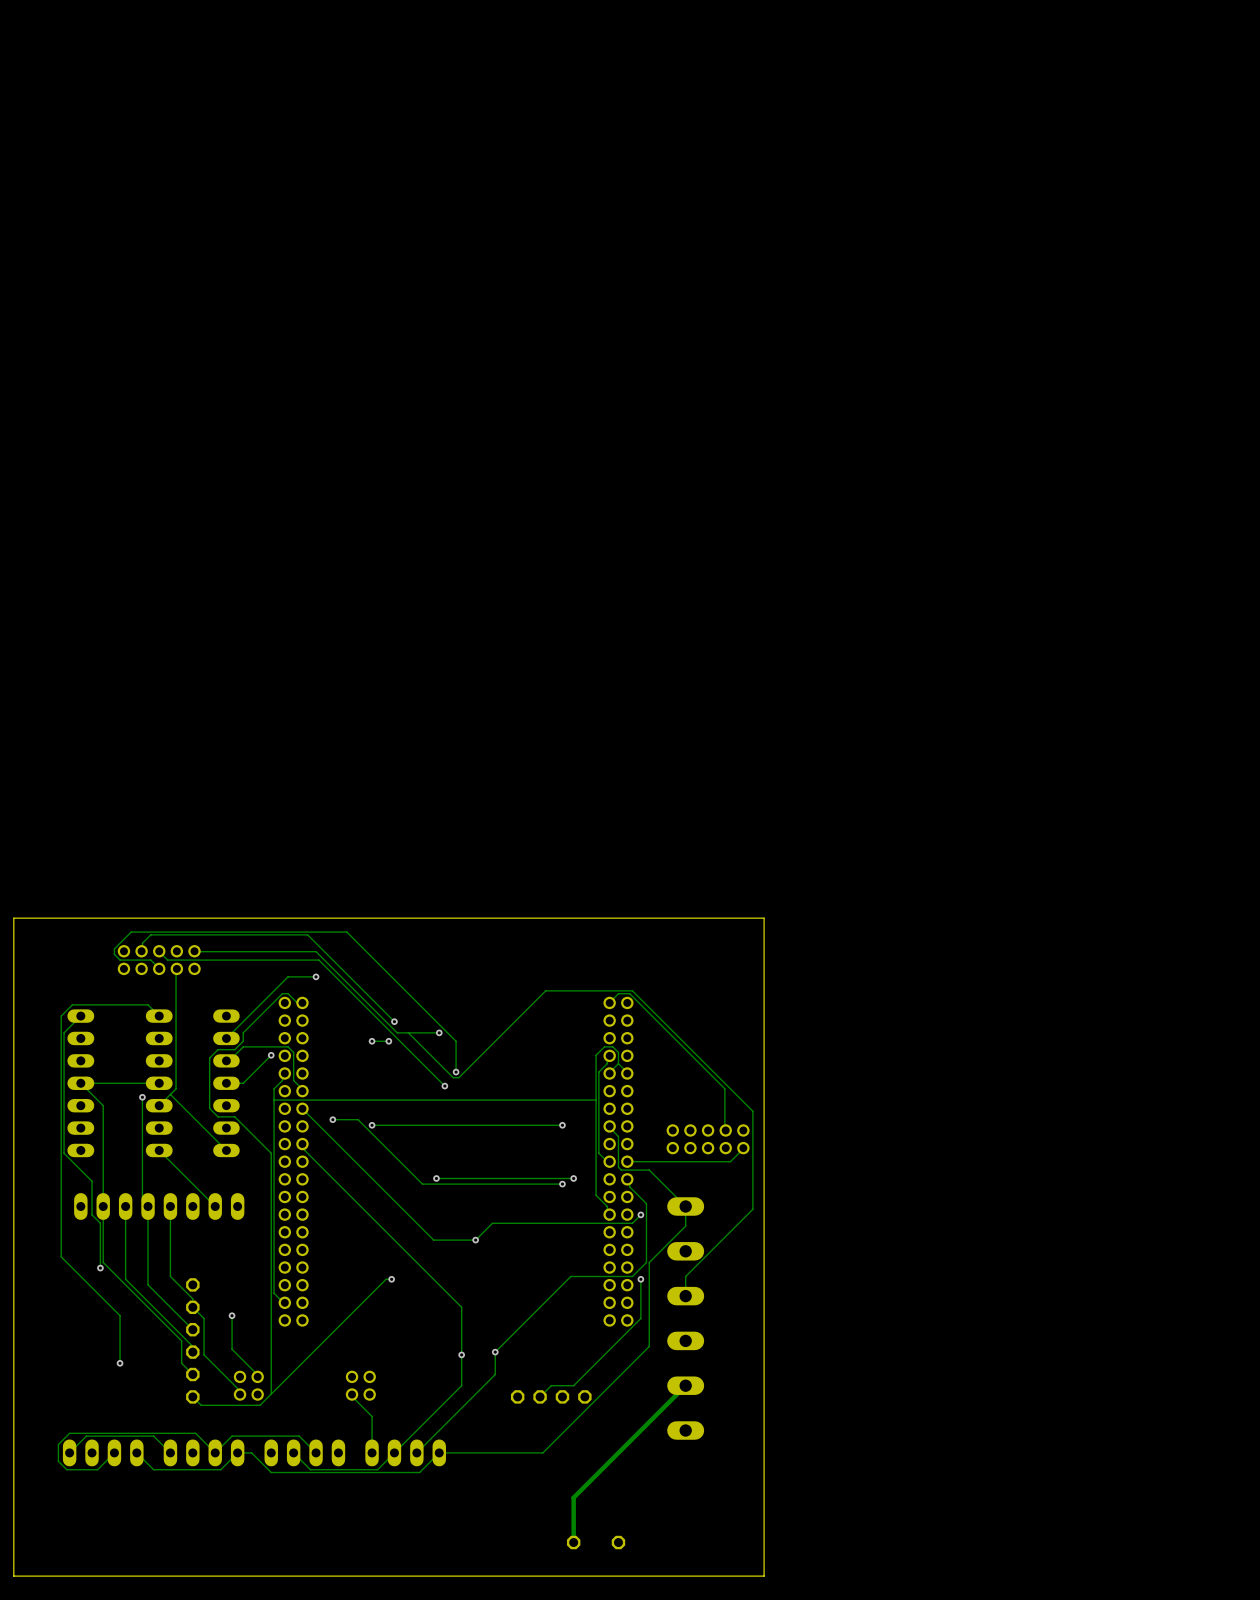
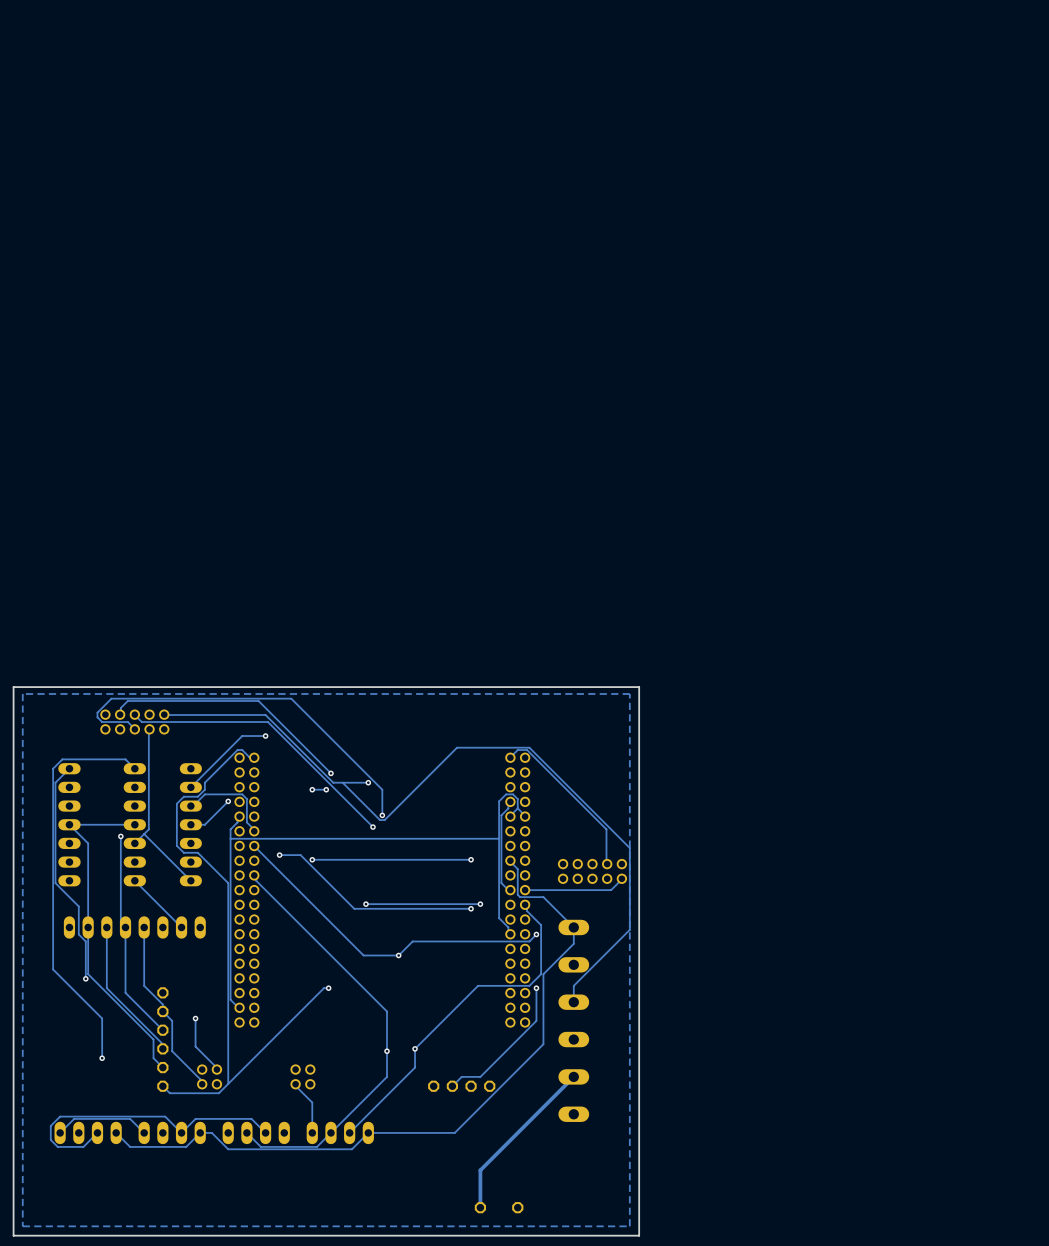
zone outline: none -> (629, 693) (22, 693) (22, 1226) (629, 1226) (629, 693)

